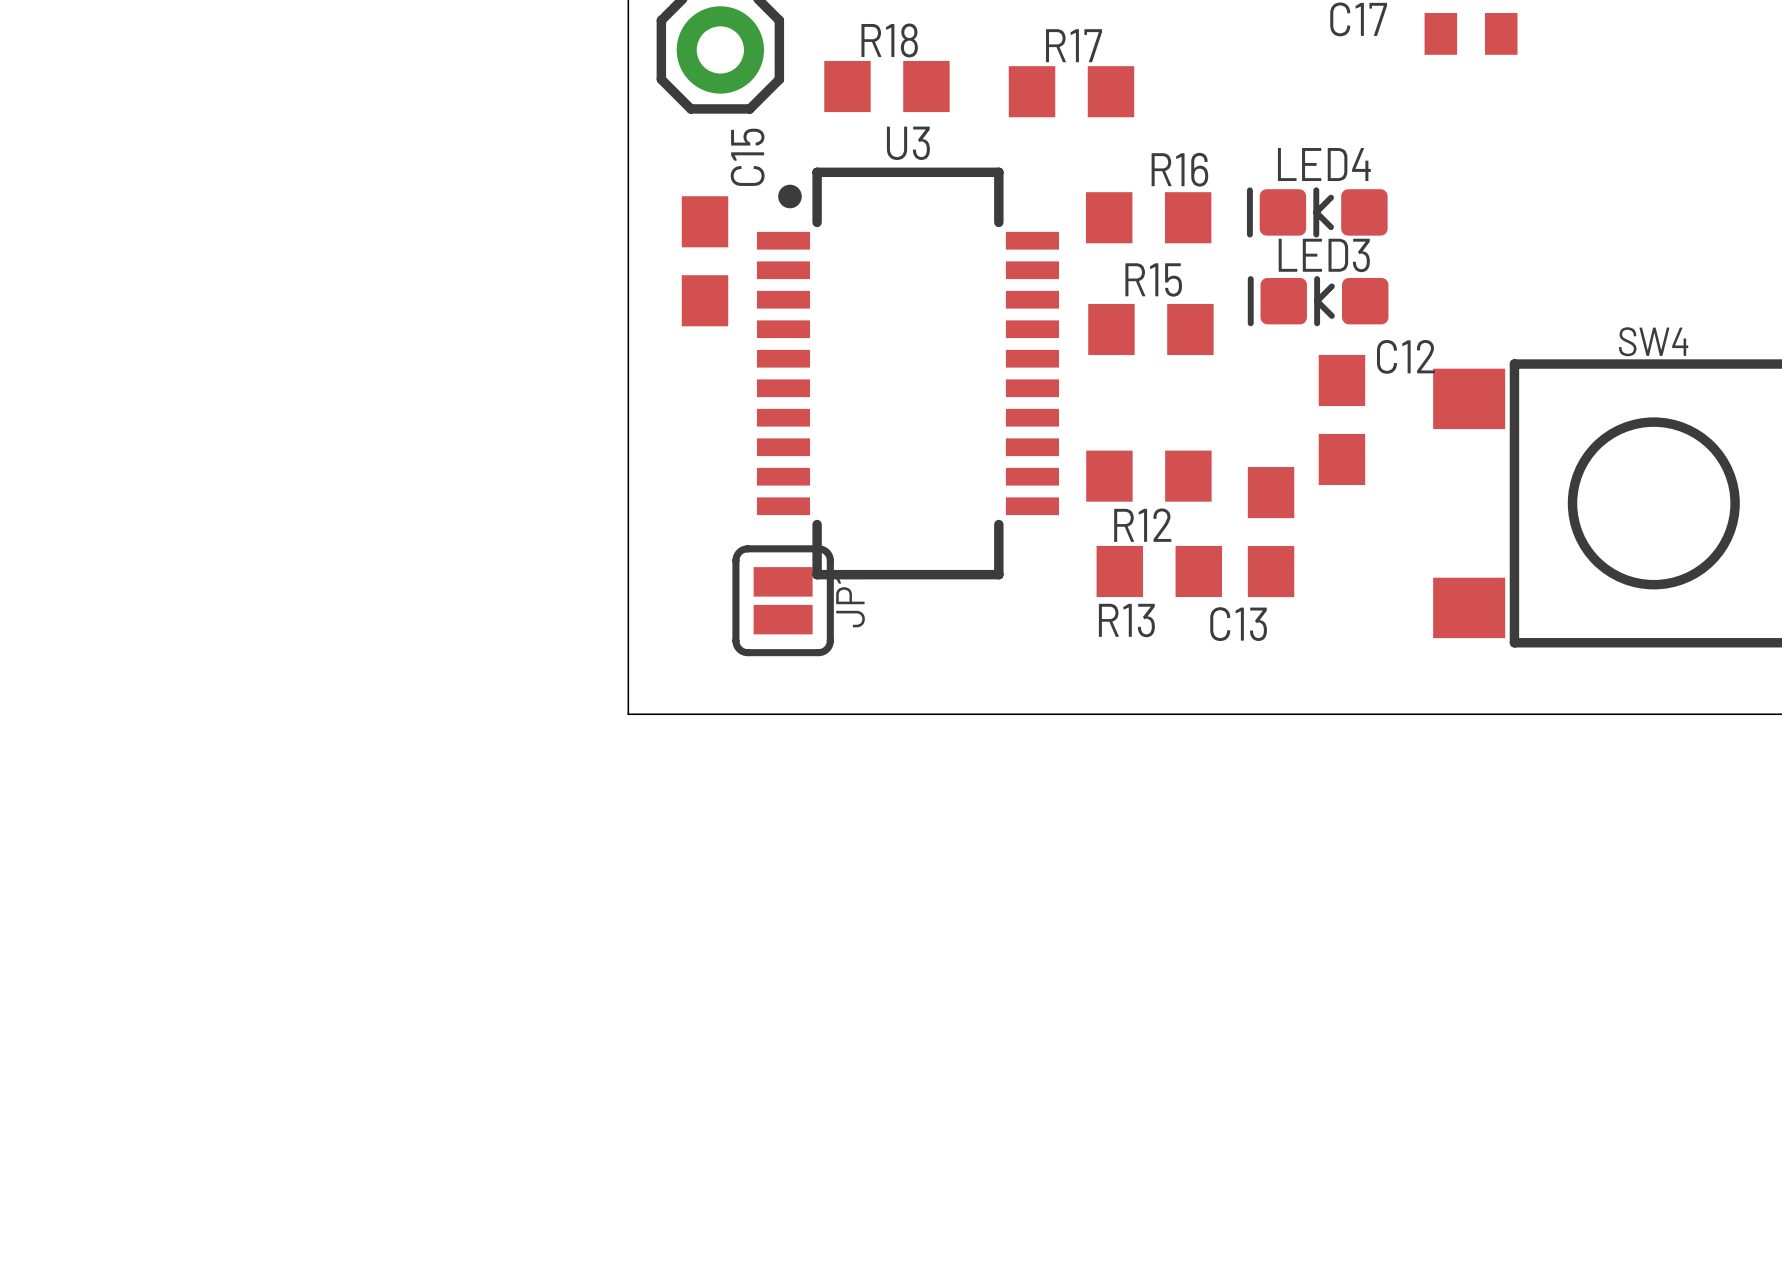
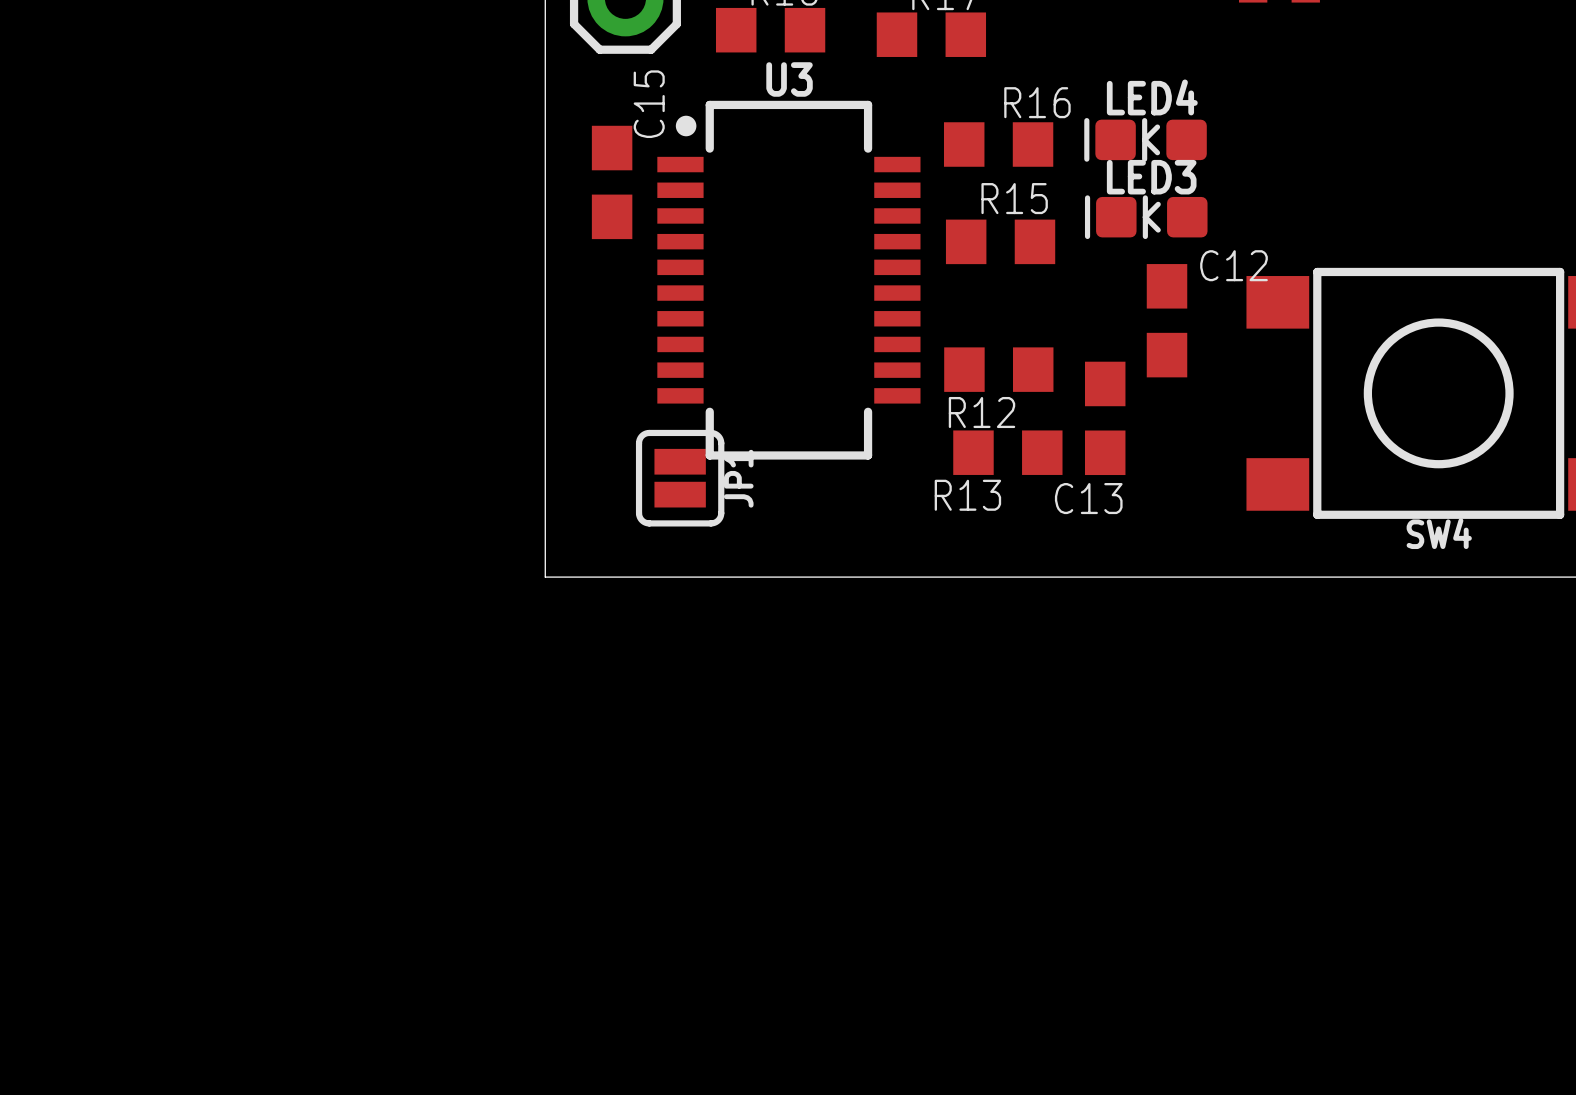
SW4 name position: SW4 (1653, 341) -> SW4 (1439, 533)

